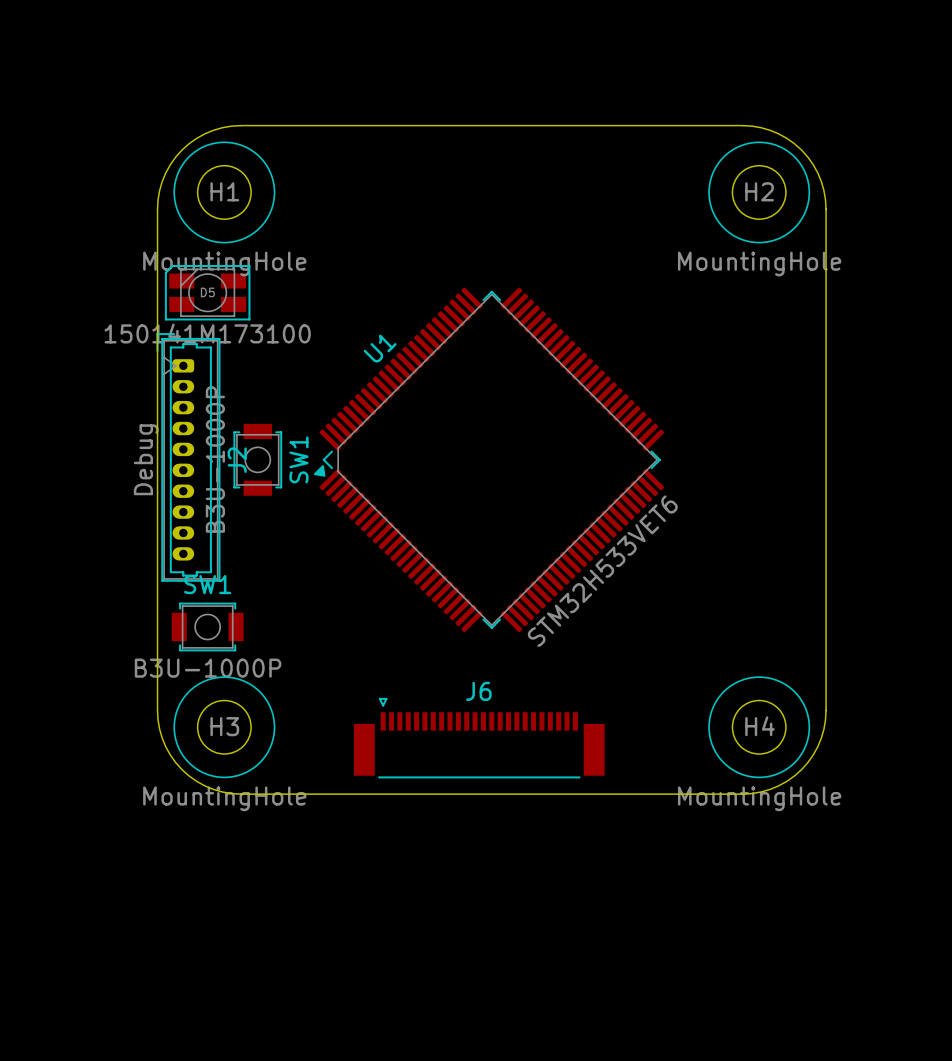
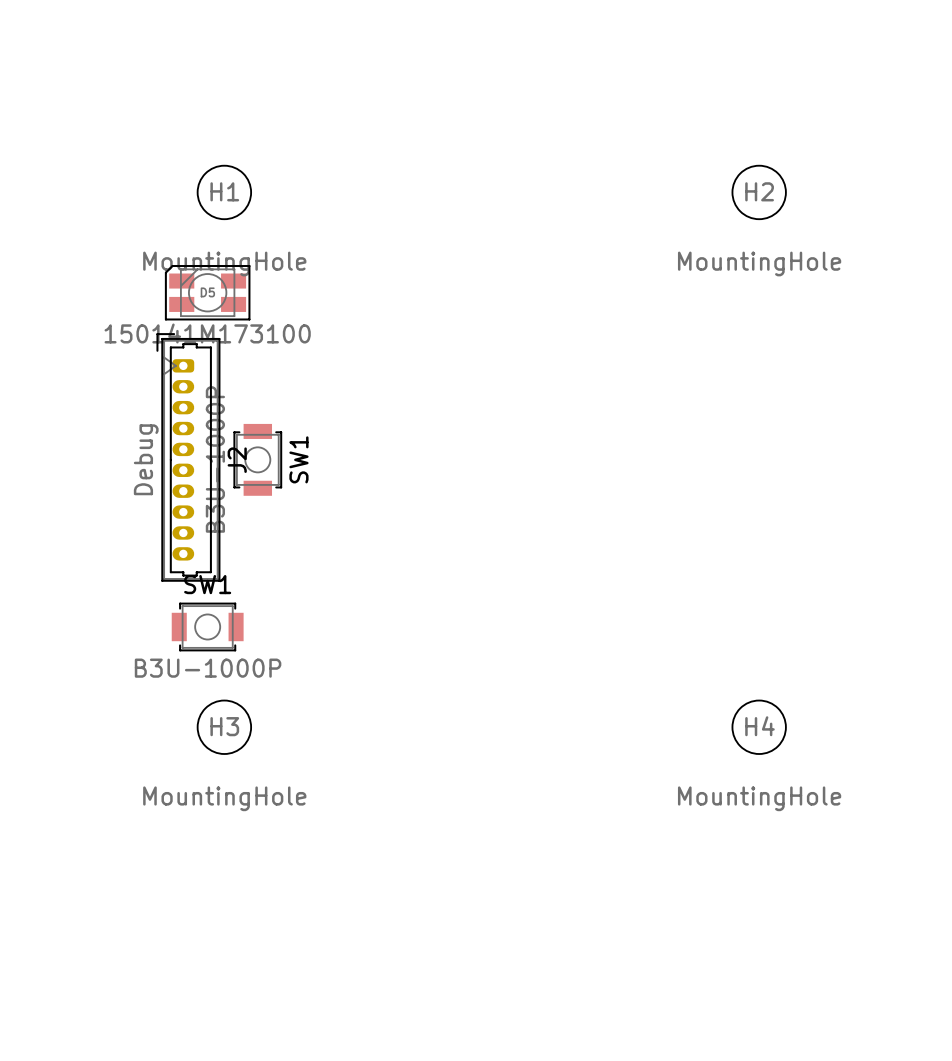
board edge: (241, 125) (742, 125) (761, 127) (778, 133) (794, 143) (807, 157) (821, 181) (826, 209) (826, 710) (823, 729) (817, 746) (807, 762) (794, 775) (770, 789) (742, 794) (241, 794) (222, 792) (204, 785) (188, 775) (175, 762) (162, 738) (157, 710) (158, 199) (162, 181) (170, 164) (188, 143) (213, 130) (241, 125) -> none
drawing: [173, 141, 276, 244] -> none
drawing: [708, 141, 811, 244] -> none
U1: STM32H533VET6 (488, 459) -> none
drawing: [173, 676, 276, 779] -> none
drawing: [708, 676, 811, 779] -> none
J6: (479, 738) -> none

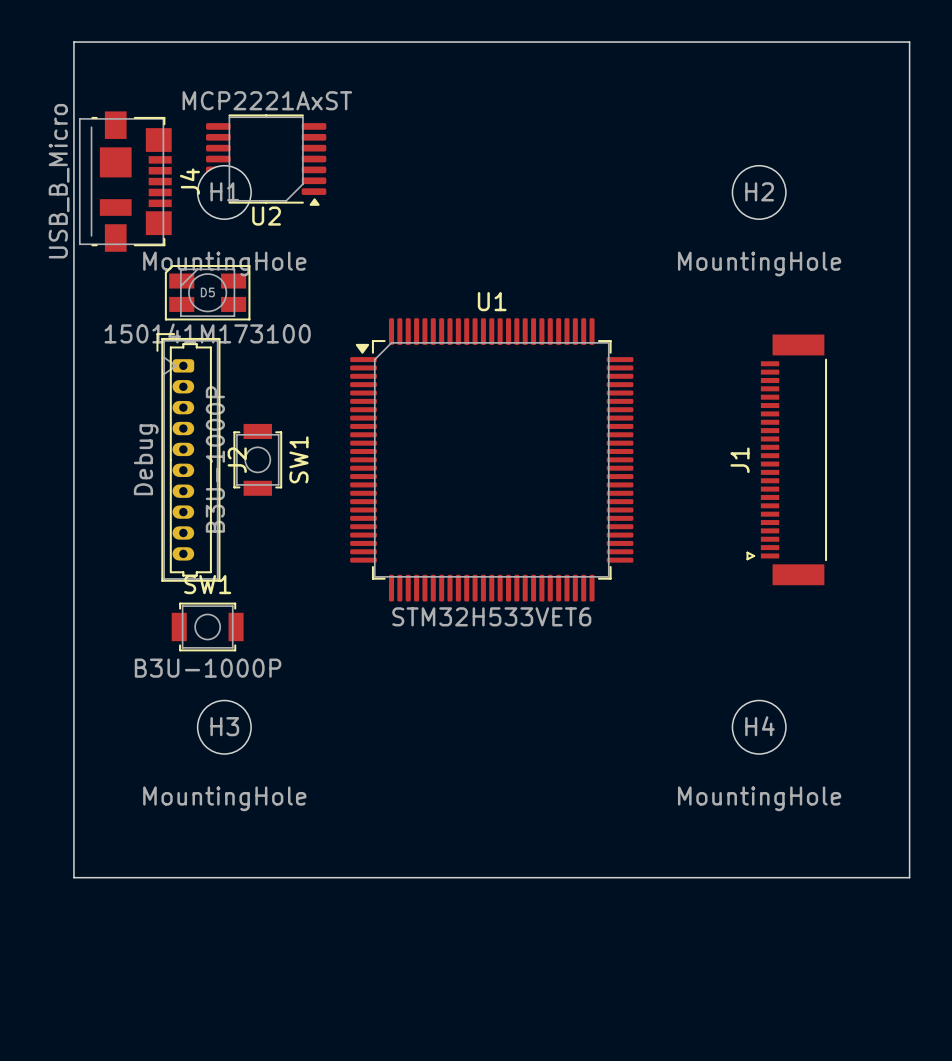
board edge: none -> (73, 42) (909, 42) (909, 877) (73, 877) (73, 42)
U2: none -> MCP2221AxST (266, 160)
J4: none -> USB_B_Micro (125, 181)
U1: none -> STM32H533VET6 (491, 459)
J1: none -> (786, 459)

